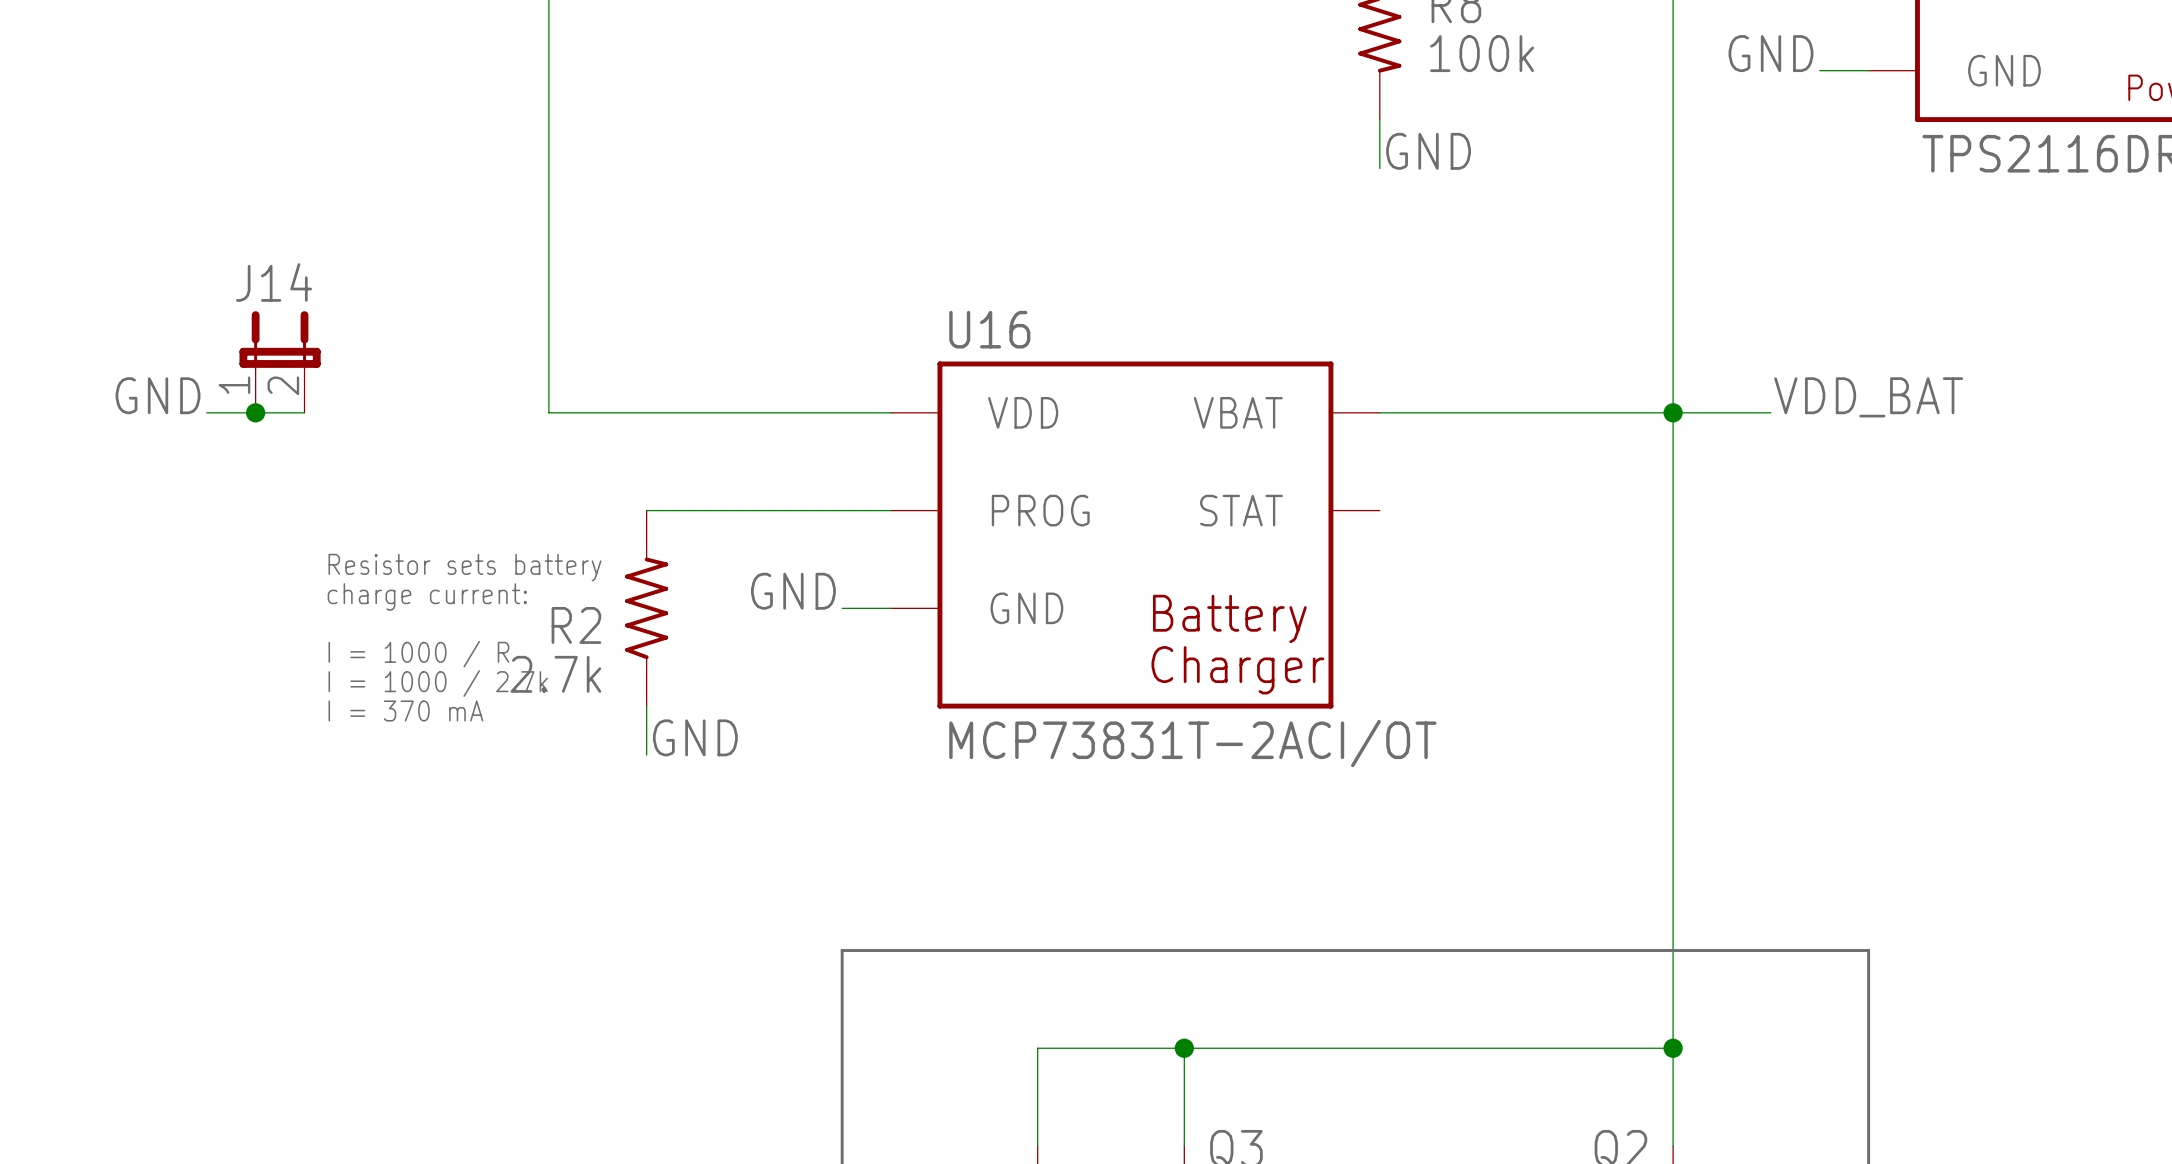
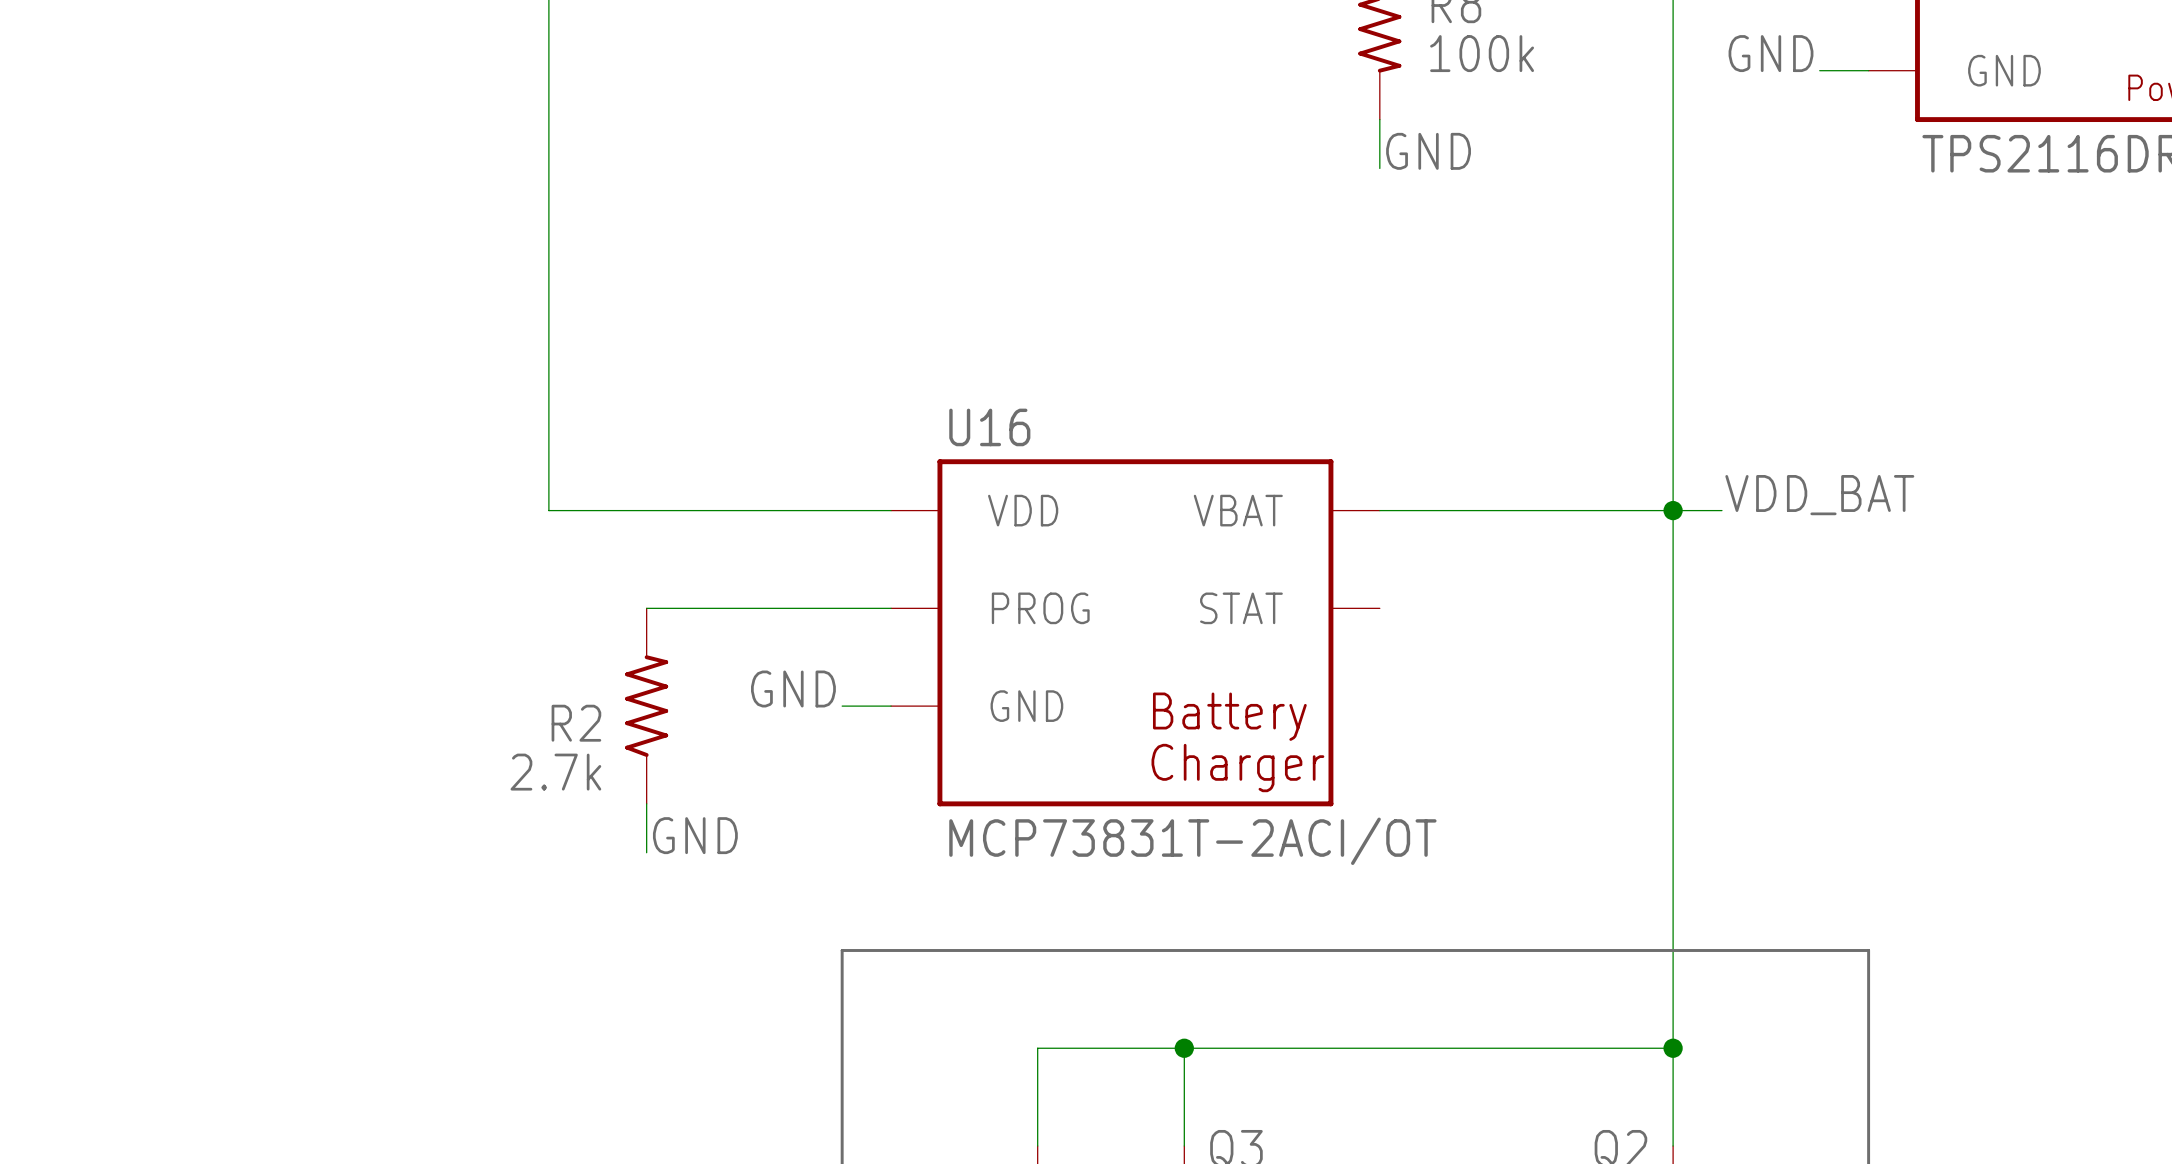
J14: (280, 362) -> none
label: GND (158, 395) -> none
label position: VDD_BAT (1868, 397) -> VDD_BAT (1819, 495)
wire: (206, 412) (304, 412) -> none
junction: (255, 412) -> none
wire: (548, 412) (891, 412) -> (548, 412) (548, 510) (646, 510)
wire: (1379, 412) (1770, 412) -> none
junction position: (1673, 412) -> (1673, 510)
wire: none -> (1379, 510) (1721, 510)
U16 position: (1135, 535) -> (1135, 632)
text: Resistor sets battery (465, 567) -> none
label position: GND (793, 591) -> GND (793, 689)
text: charge current: (427, 596) -> none
wire: none -> (646, 608) (842, 608)
R2 position: (646, 608) -> (646, 706)
text: I = 1000 / R (418, 654) -> none
text: I = 1000 / 2.7k (438, 683) -> none
wire: (646, 706) (646, 754) -> (646, 803) (646, 852)
wire: none -> (842, 706) (891, 706)
text: I = 370 mA (405, 710) -> none
label position: GND (695, 737) -> GND (695, 835)

